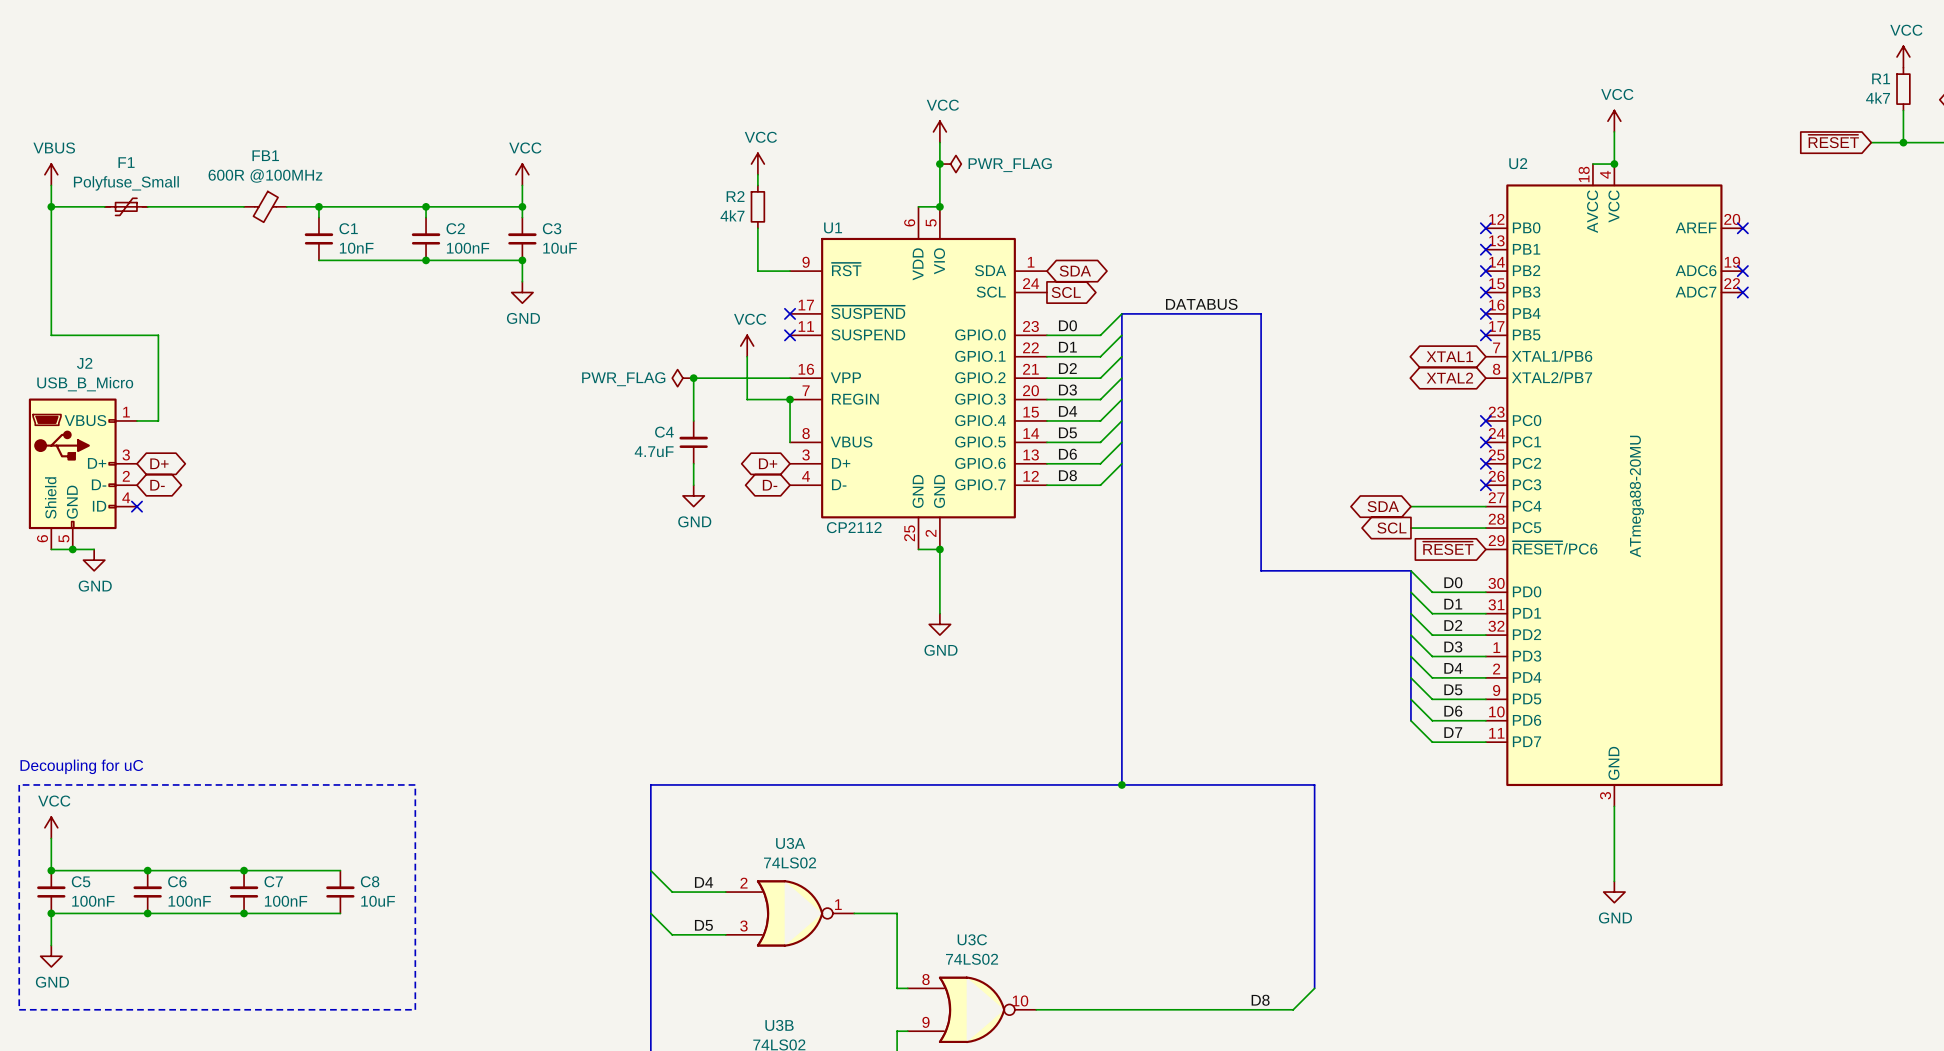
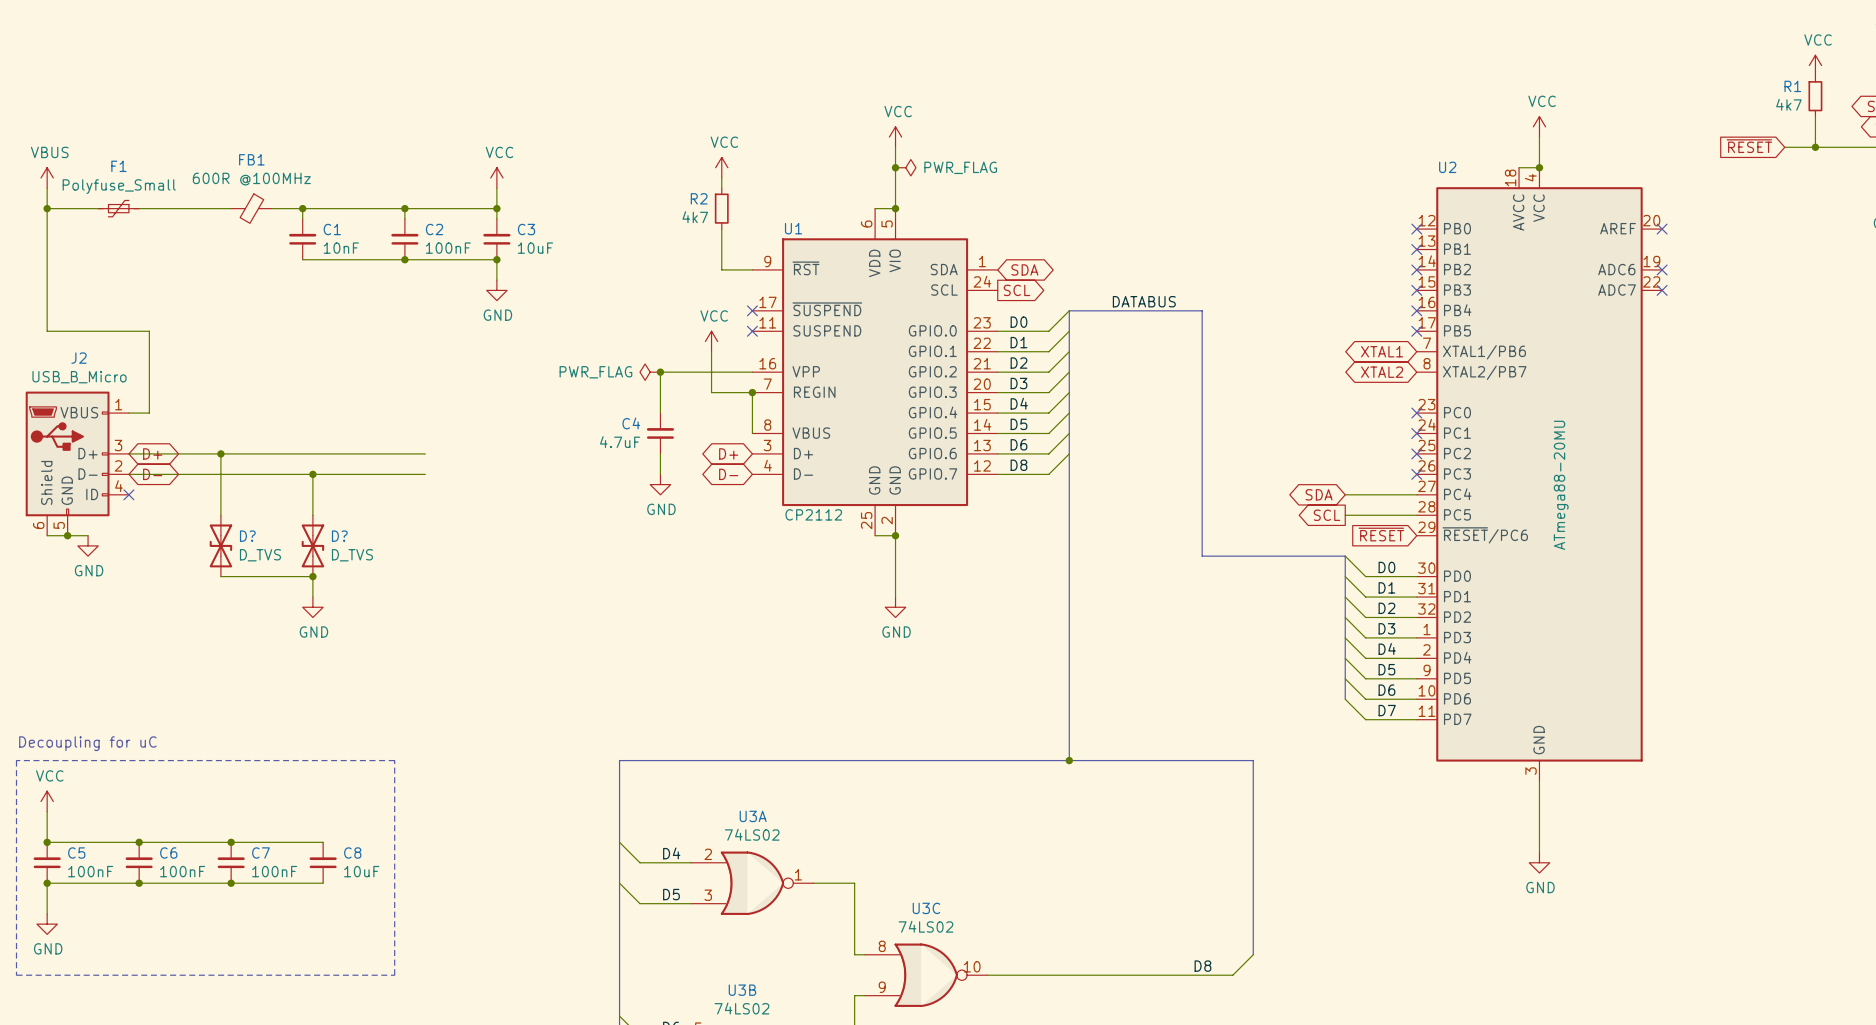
wire: none -> (128, 453) (425, 453)
wire: none -> (220, 453) (220, 515)
junction: none -> (220, 453)
wire: none -> (128, 474) (425, 474)
wire: none -> (312, 474) (312, 515)
junction: none -> (312, 474)
D?: none -> D_TVS (220, 545)
D?: none -> D_TVS (312, 545)
wire: none -> (220, 576) (312, 576) (312, 597)
junction: none -> (312, 576)
power symbol: none -> GND (312, 607)

